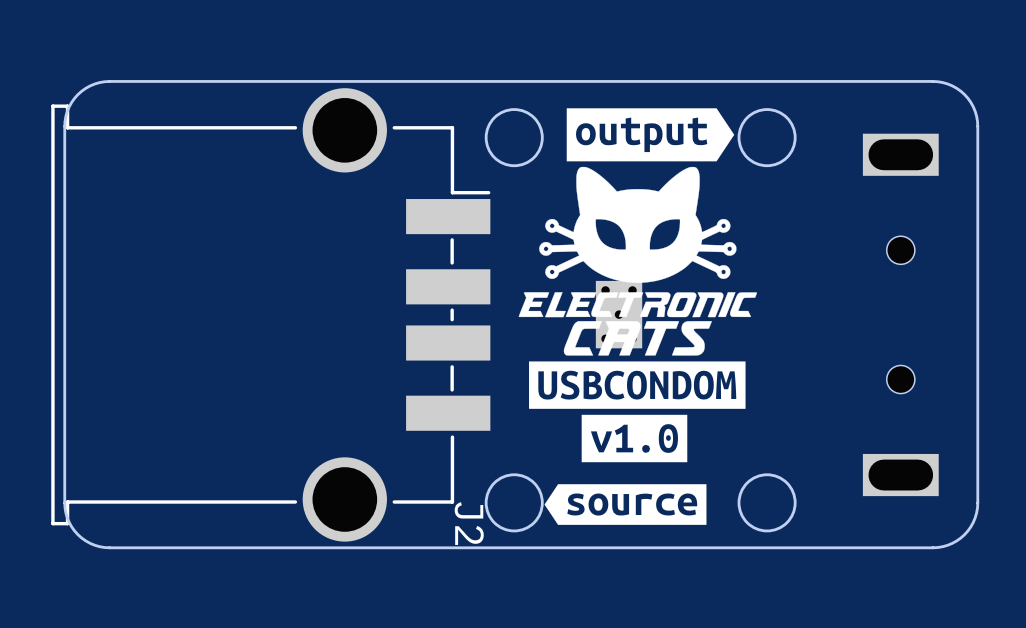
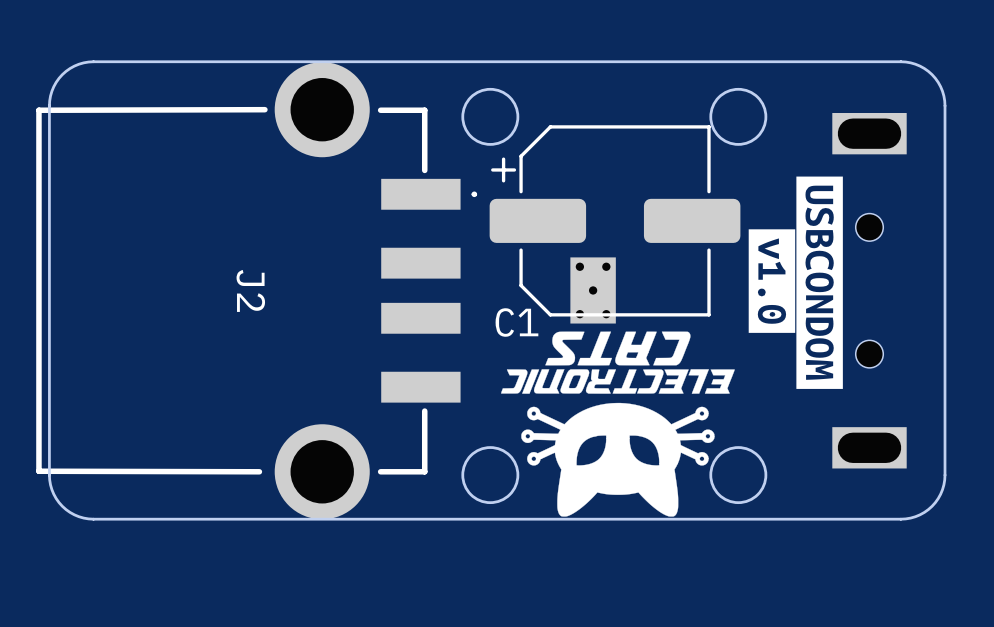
J2 footprint: [51, 88, 491, 542] -> [36, 62, 478, 520]
drawing: [518, 108, 757, 409] -> none
drawing: none -> [748, 176, 843, 389]
C1: none -> (615, 220)
drawing shape: [581, 414, 688, 463] -> [501, 331, 735, 517]
drawing: [544, 484, 707, 525] -> none
J2 name position: J2 (469, 523) -> J2 (250, 290)

